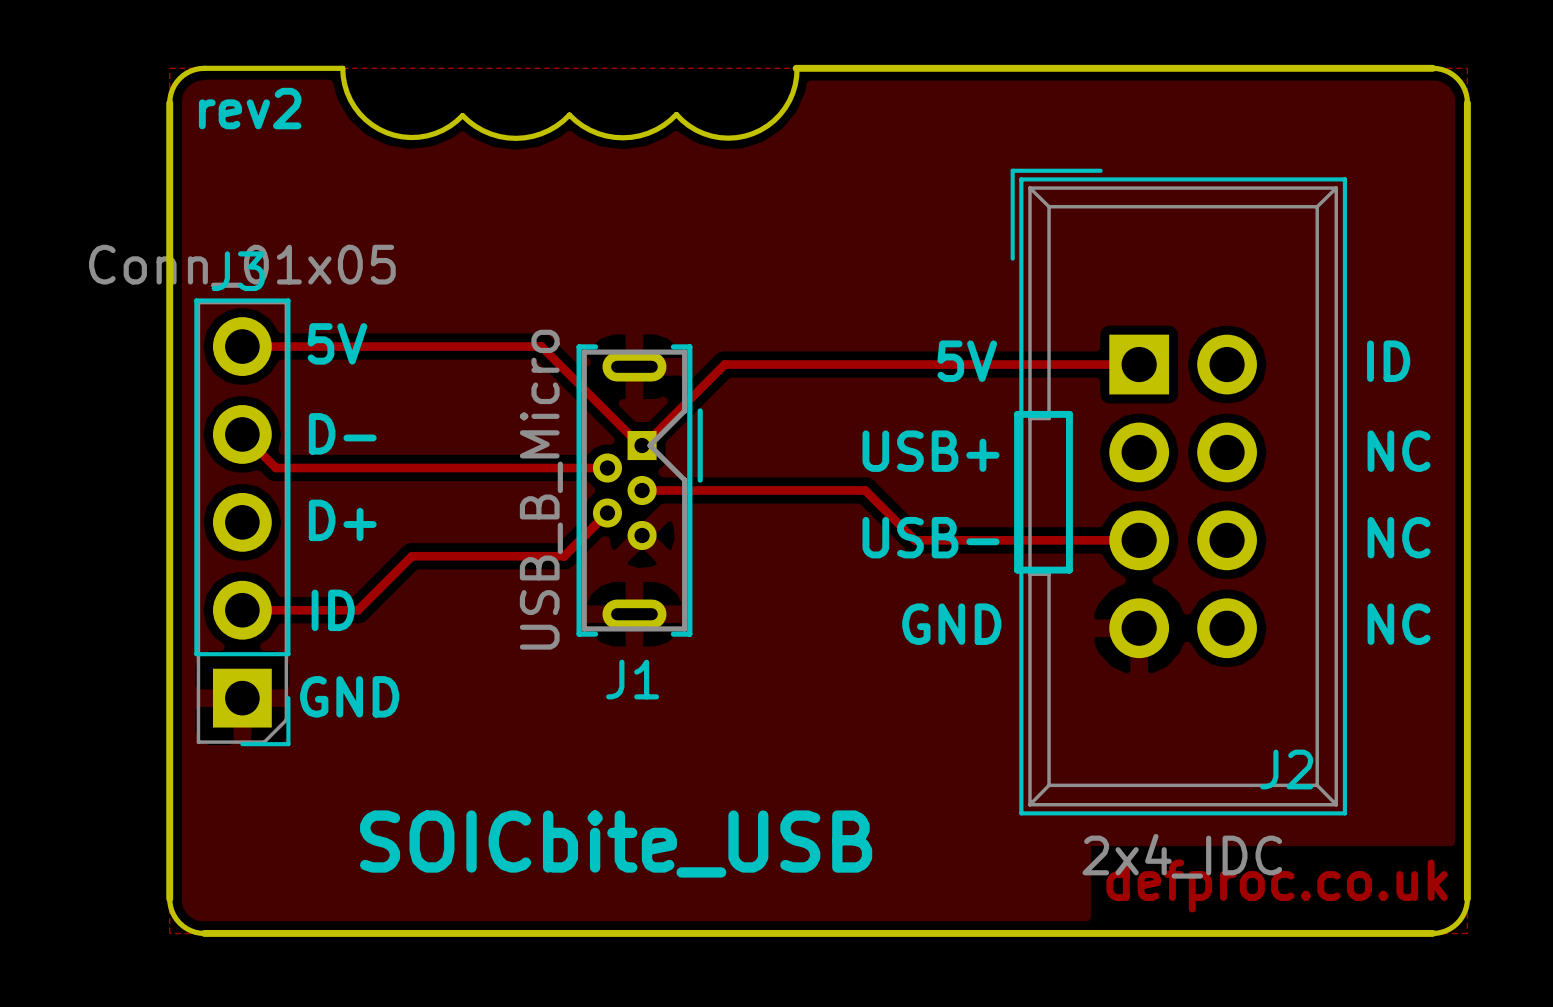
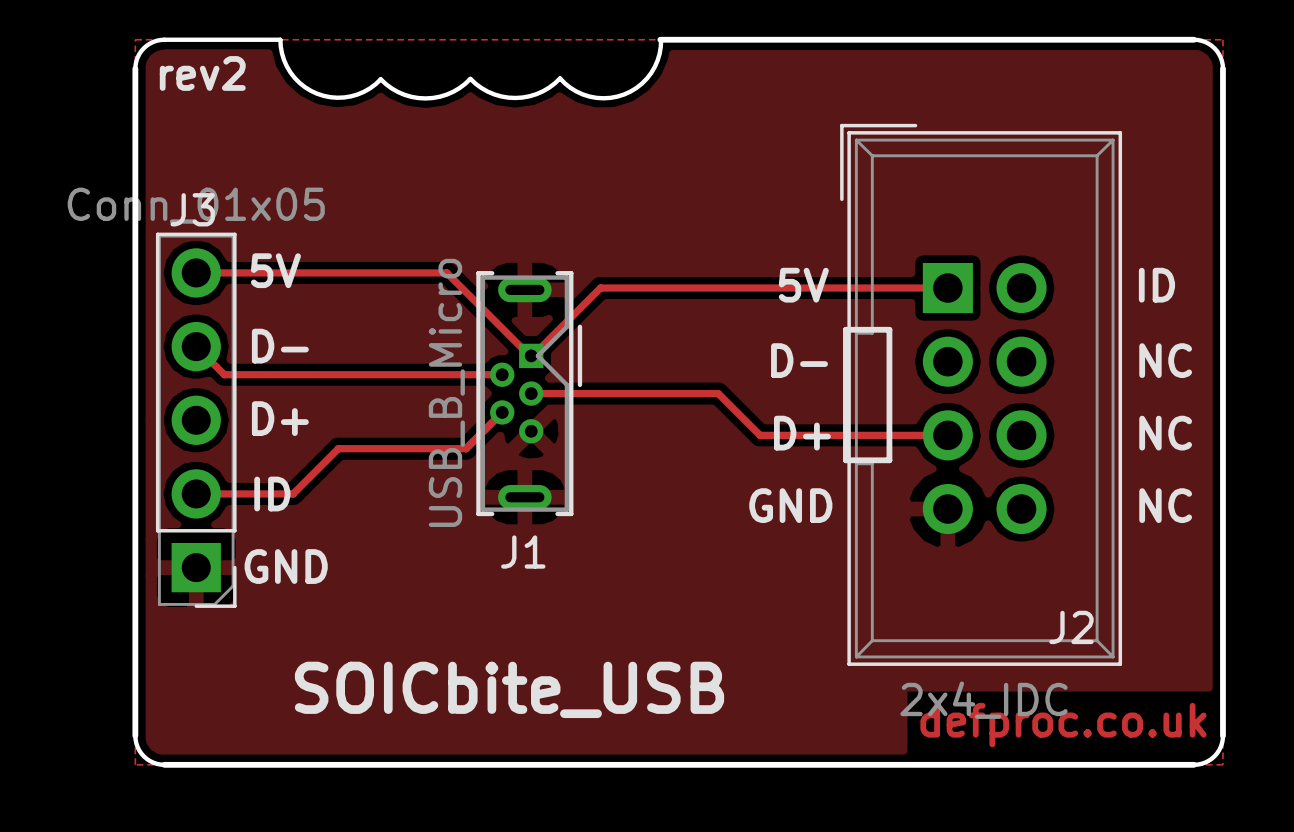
text: USB+ (931, 451) -> D- (799, 360)
text: USB- (931, 537) -> D+ (802, 433)

